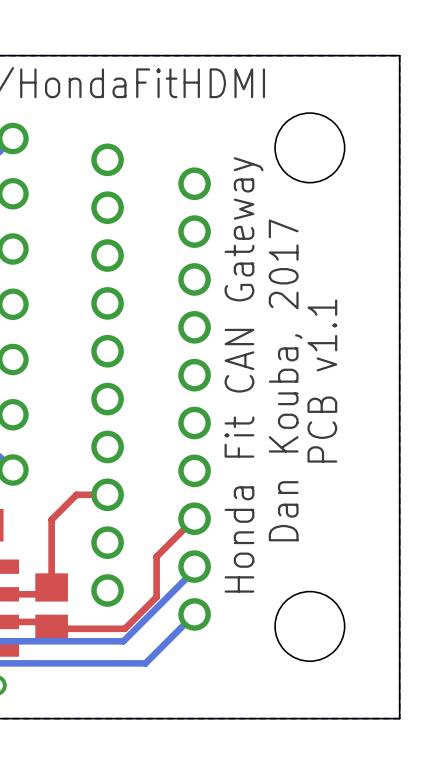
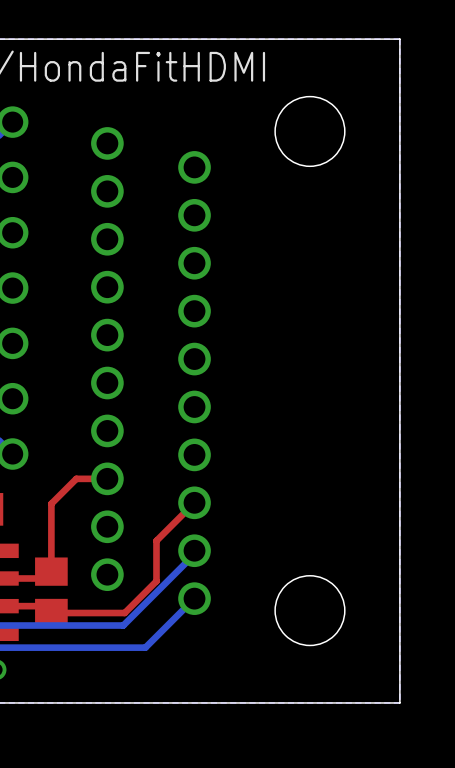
text: Honda Fit CAN Gateway (244, 374) -> none
text: Dan Kouba, 2017 (285, 380) -> none
text: PCB v1.1 (322, 381) -> none

